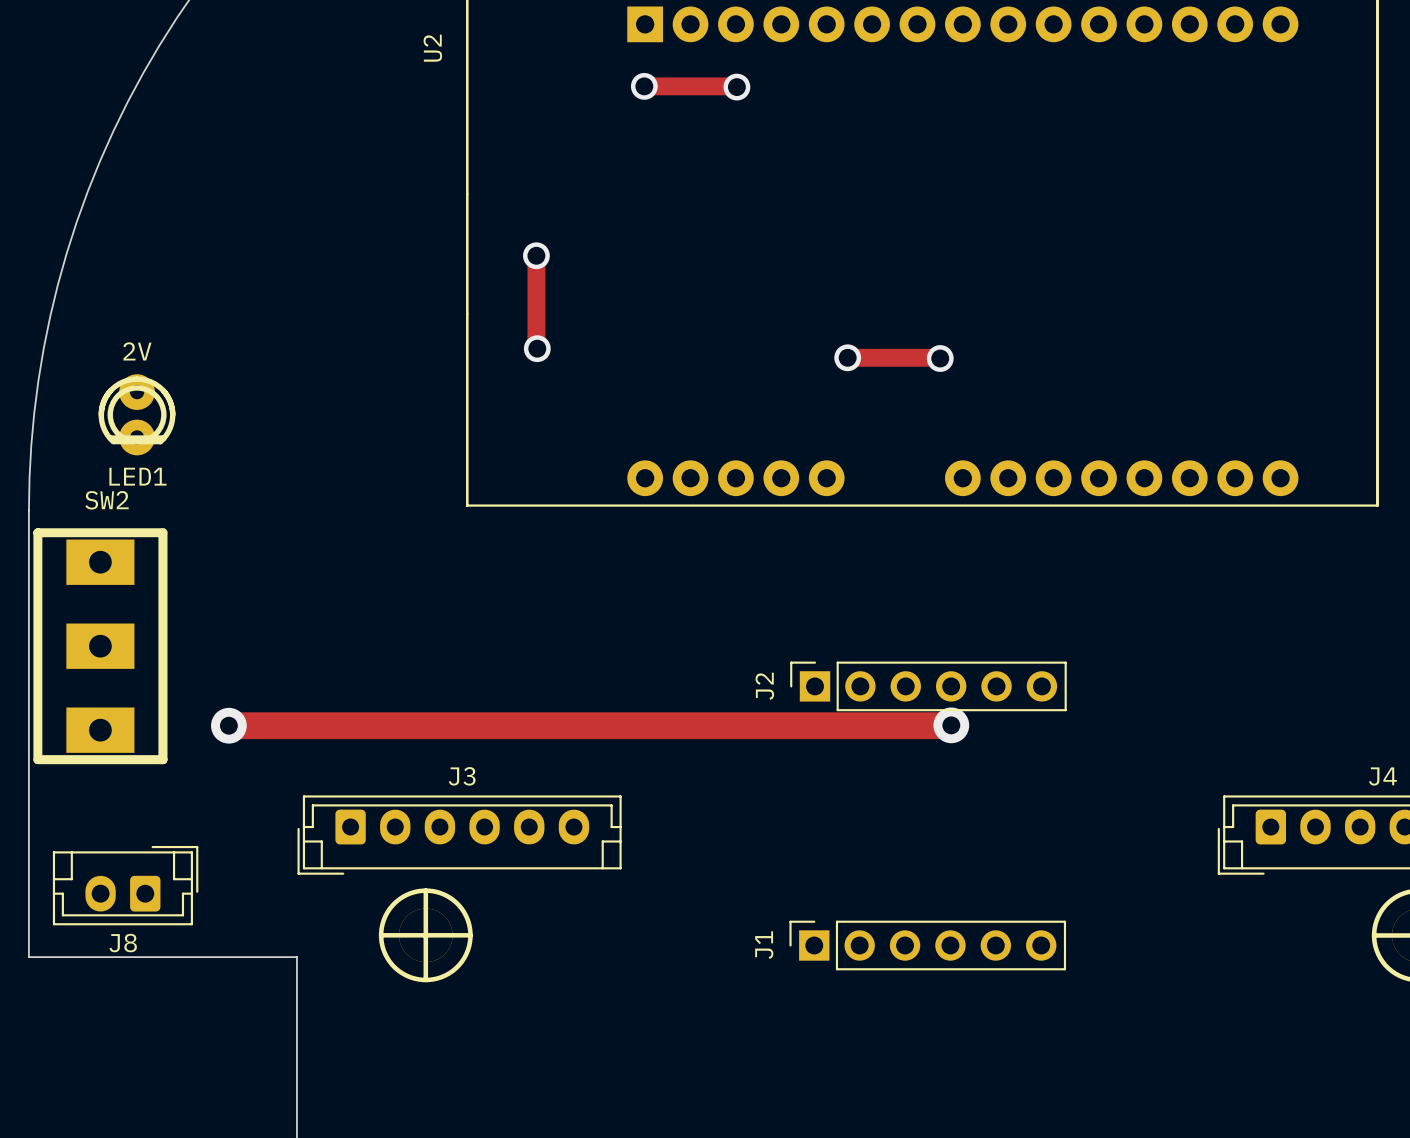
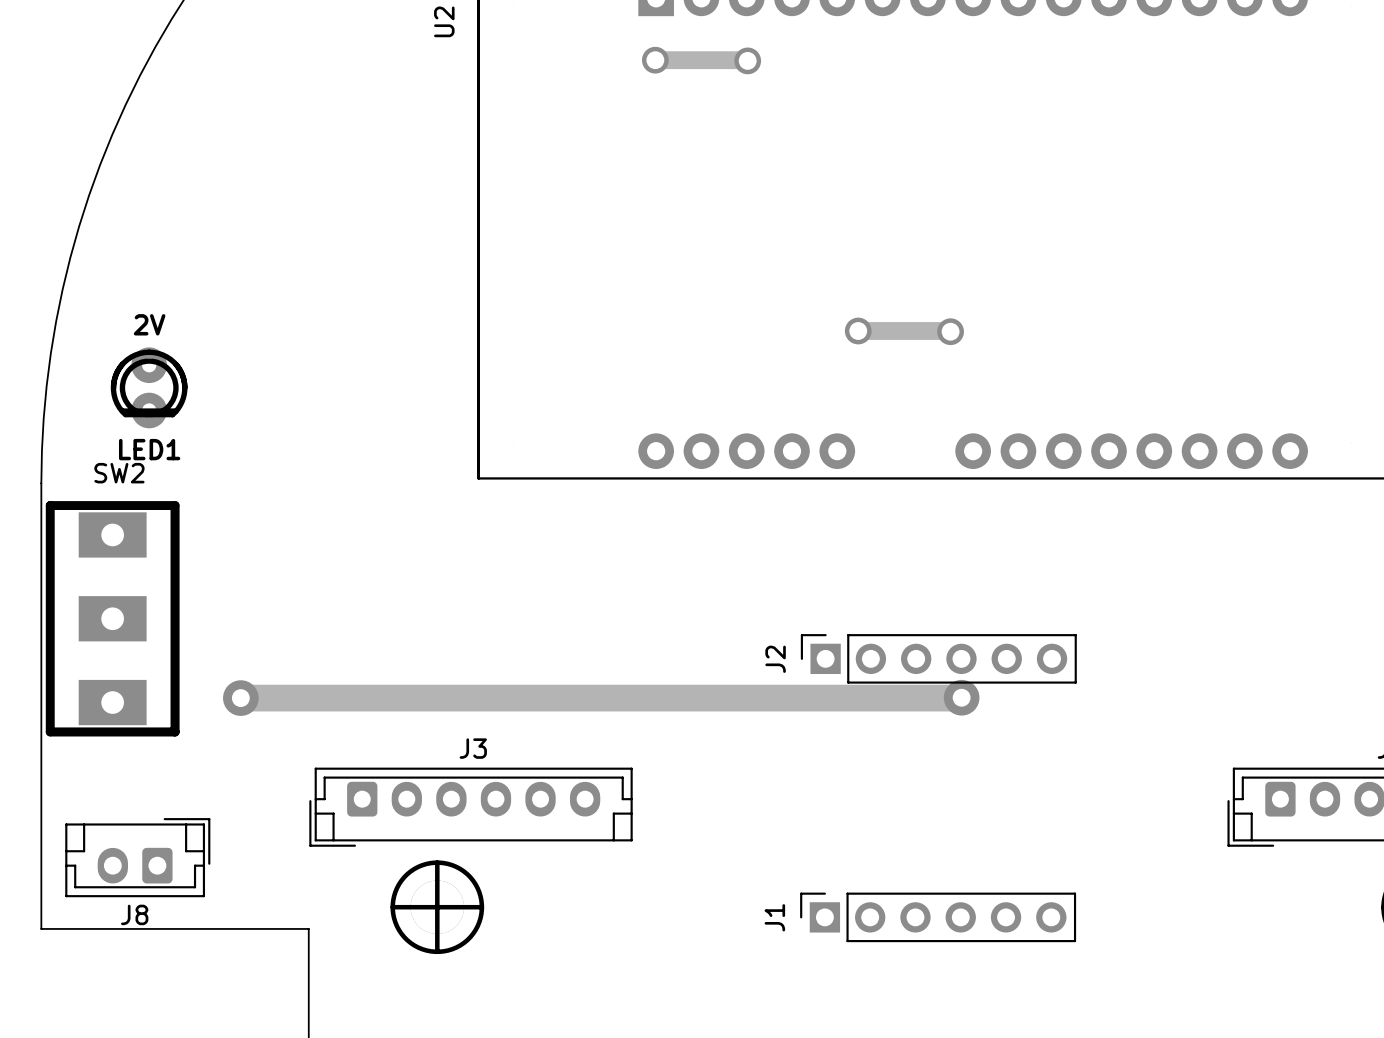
track: (536, 255) (536, 347) -> none
via: (536, 255) -> none
via: (537, 348) -> none

